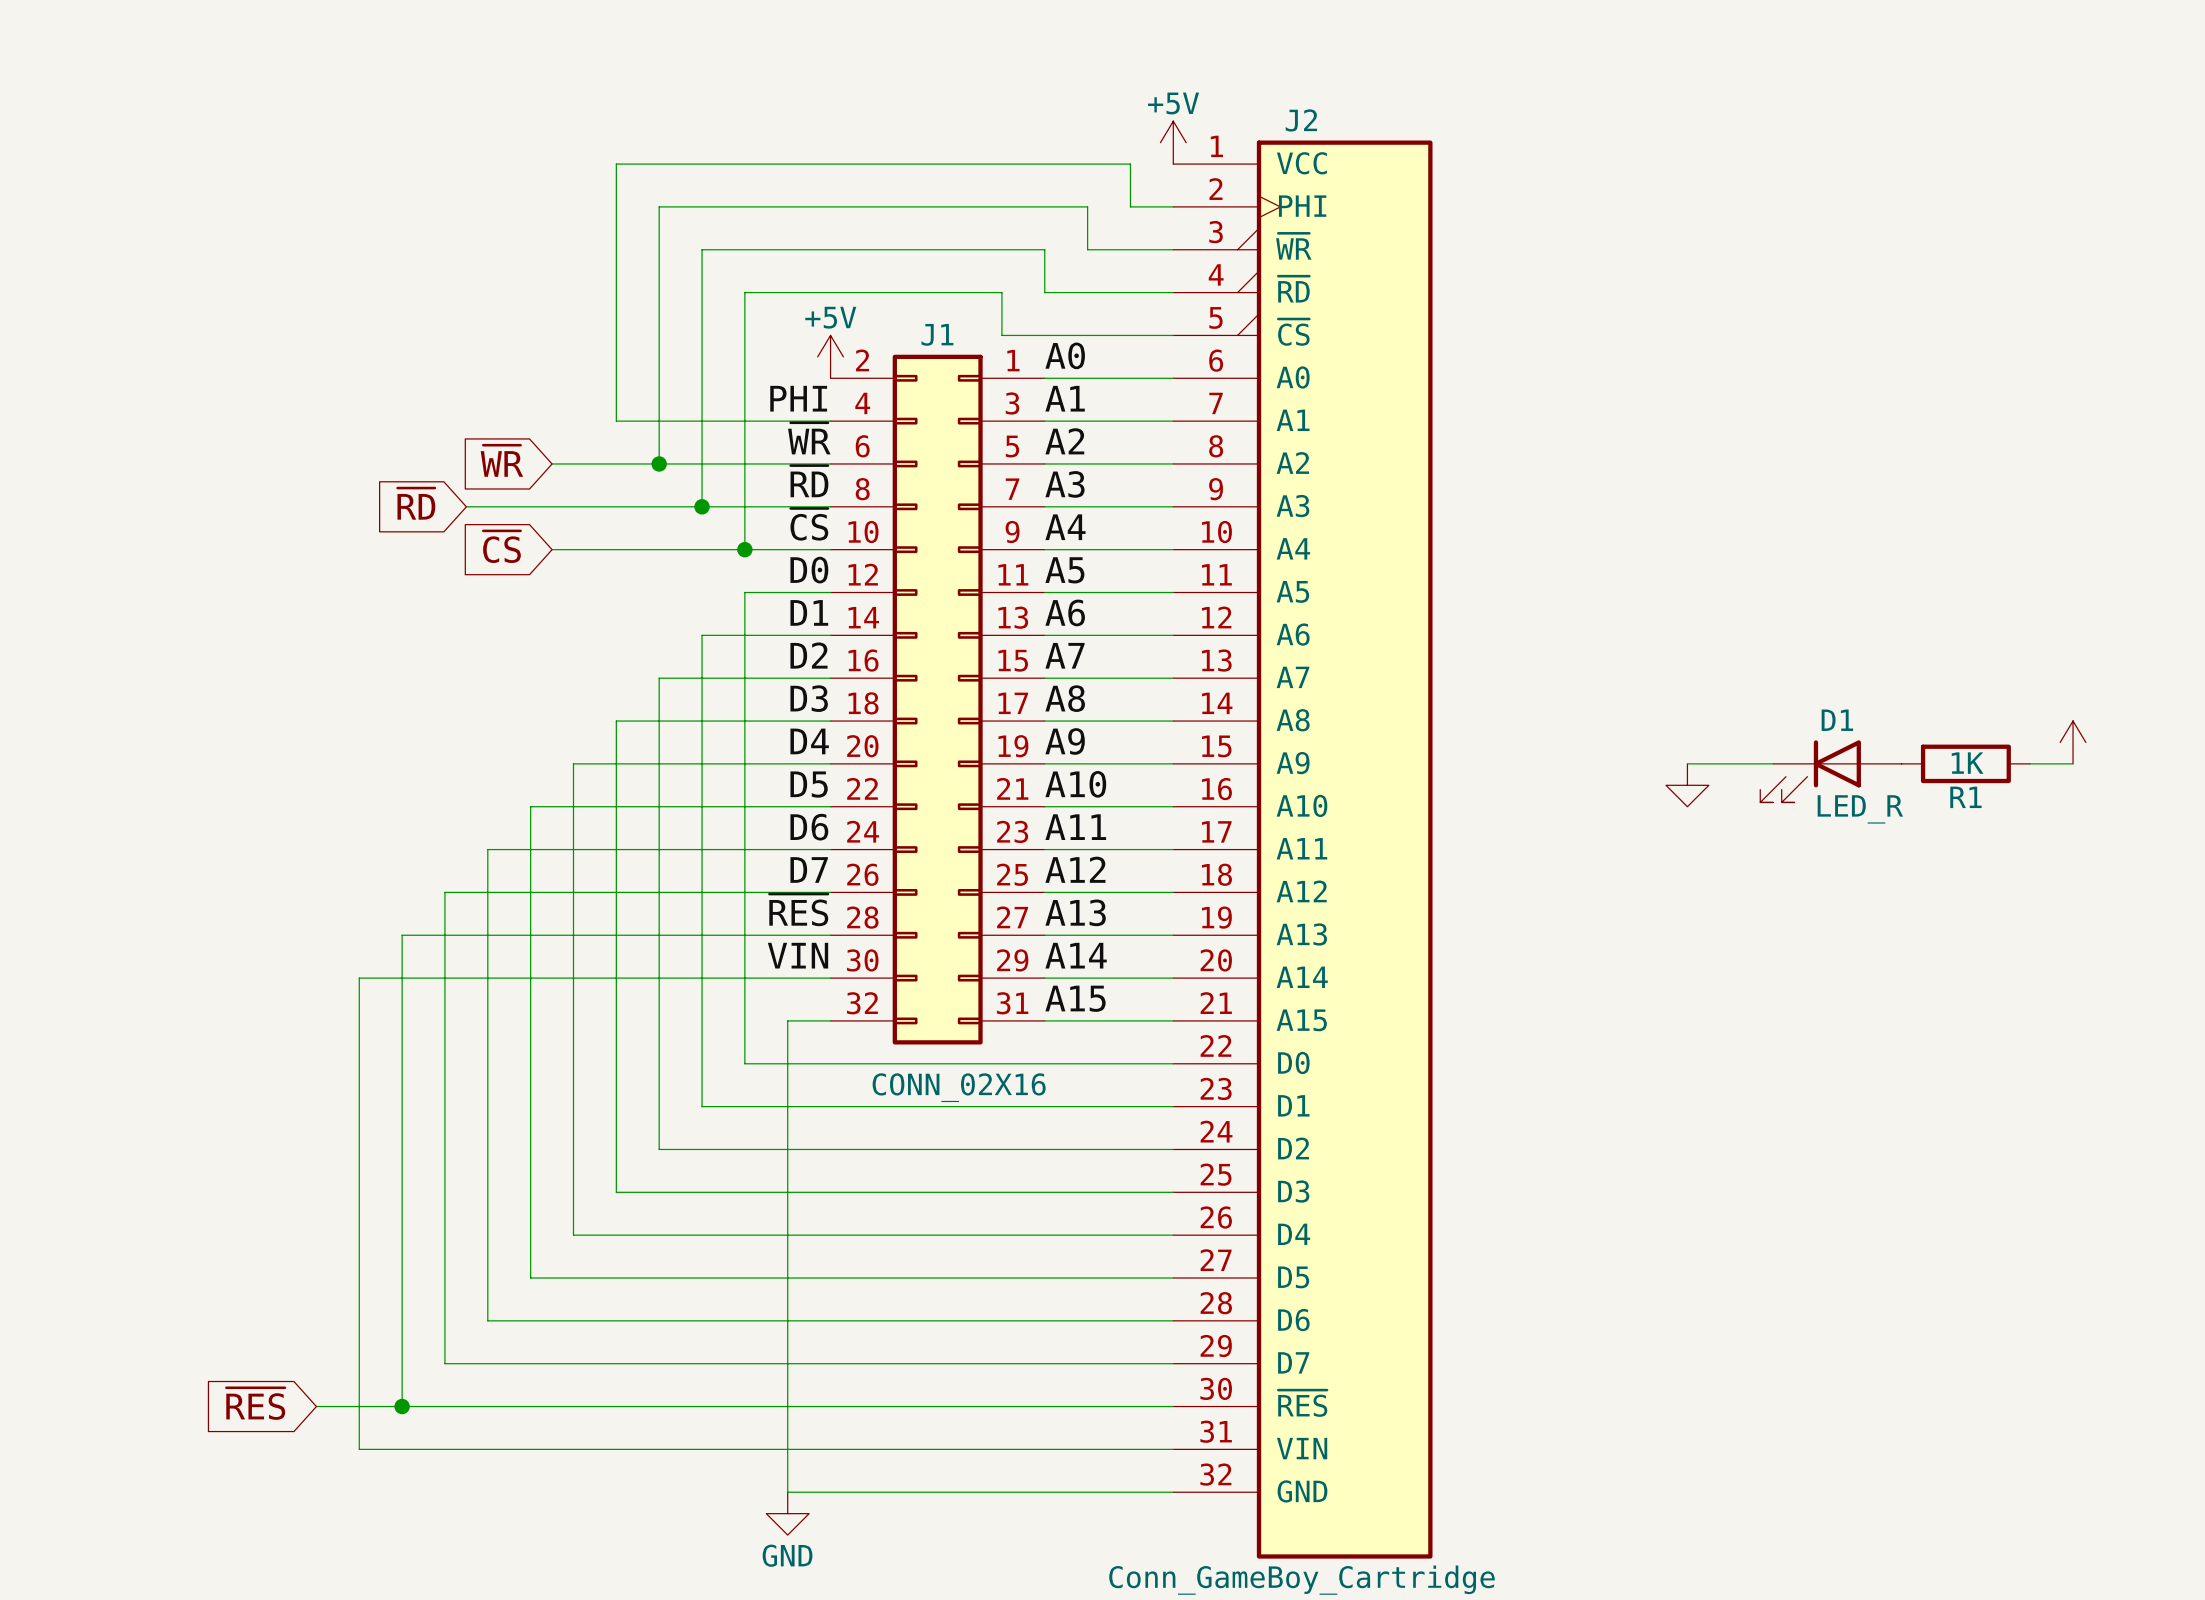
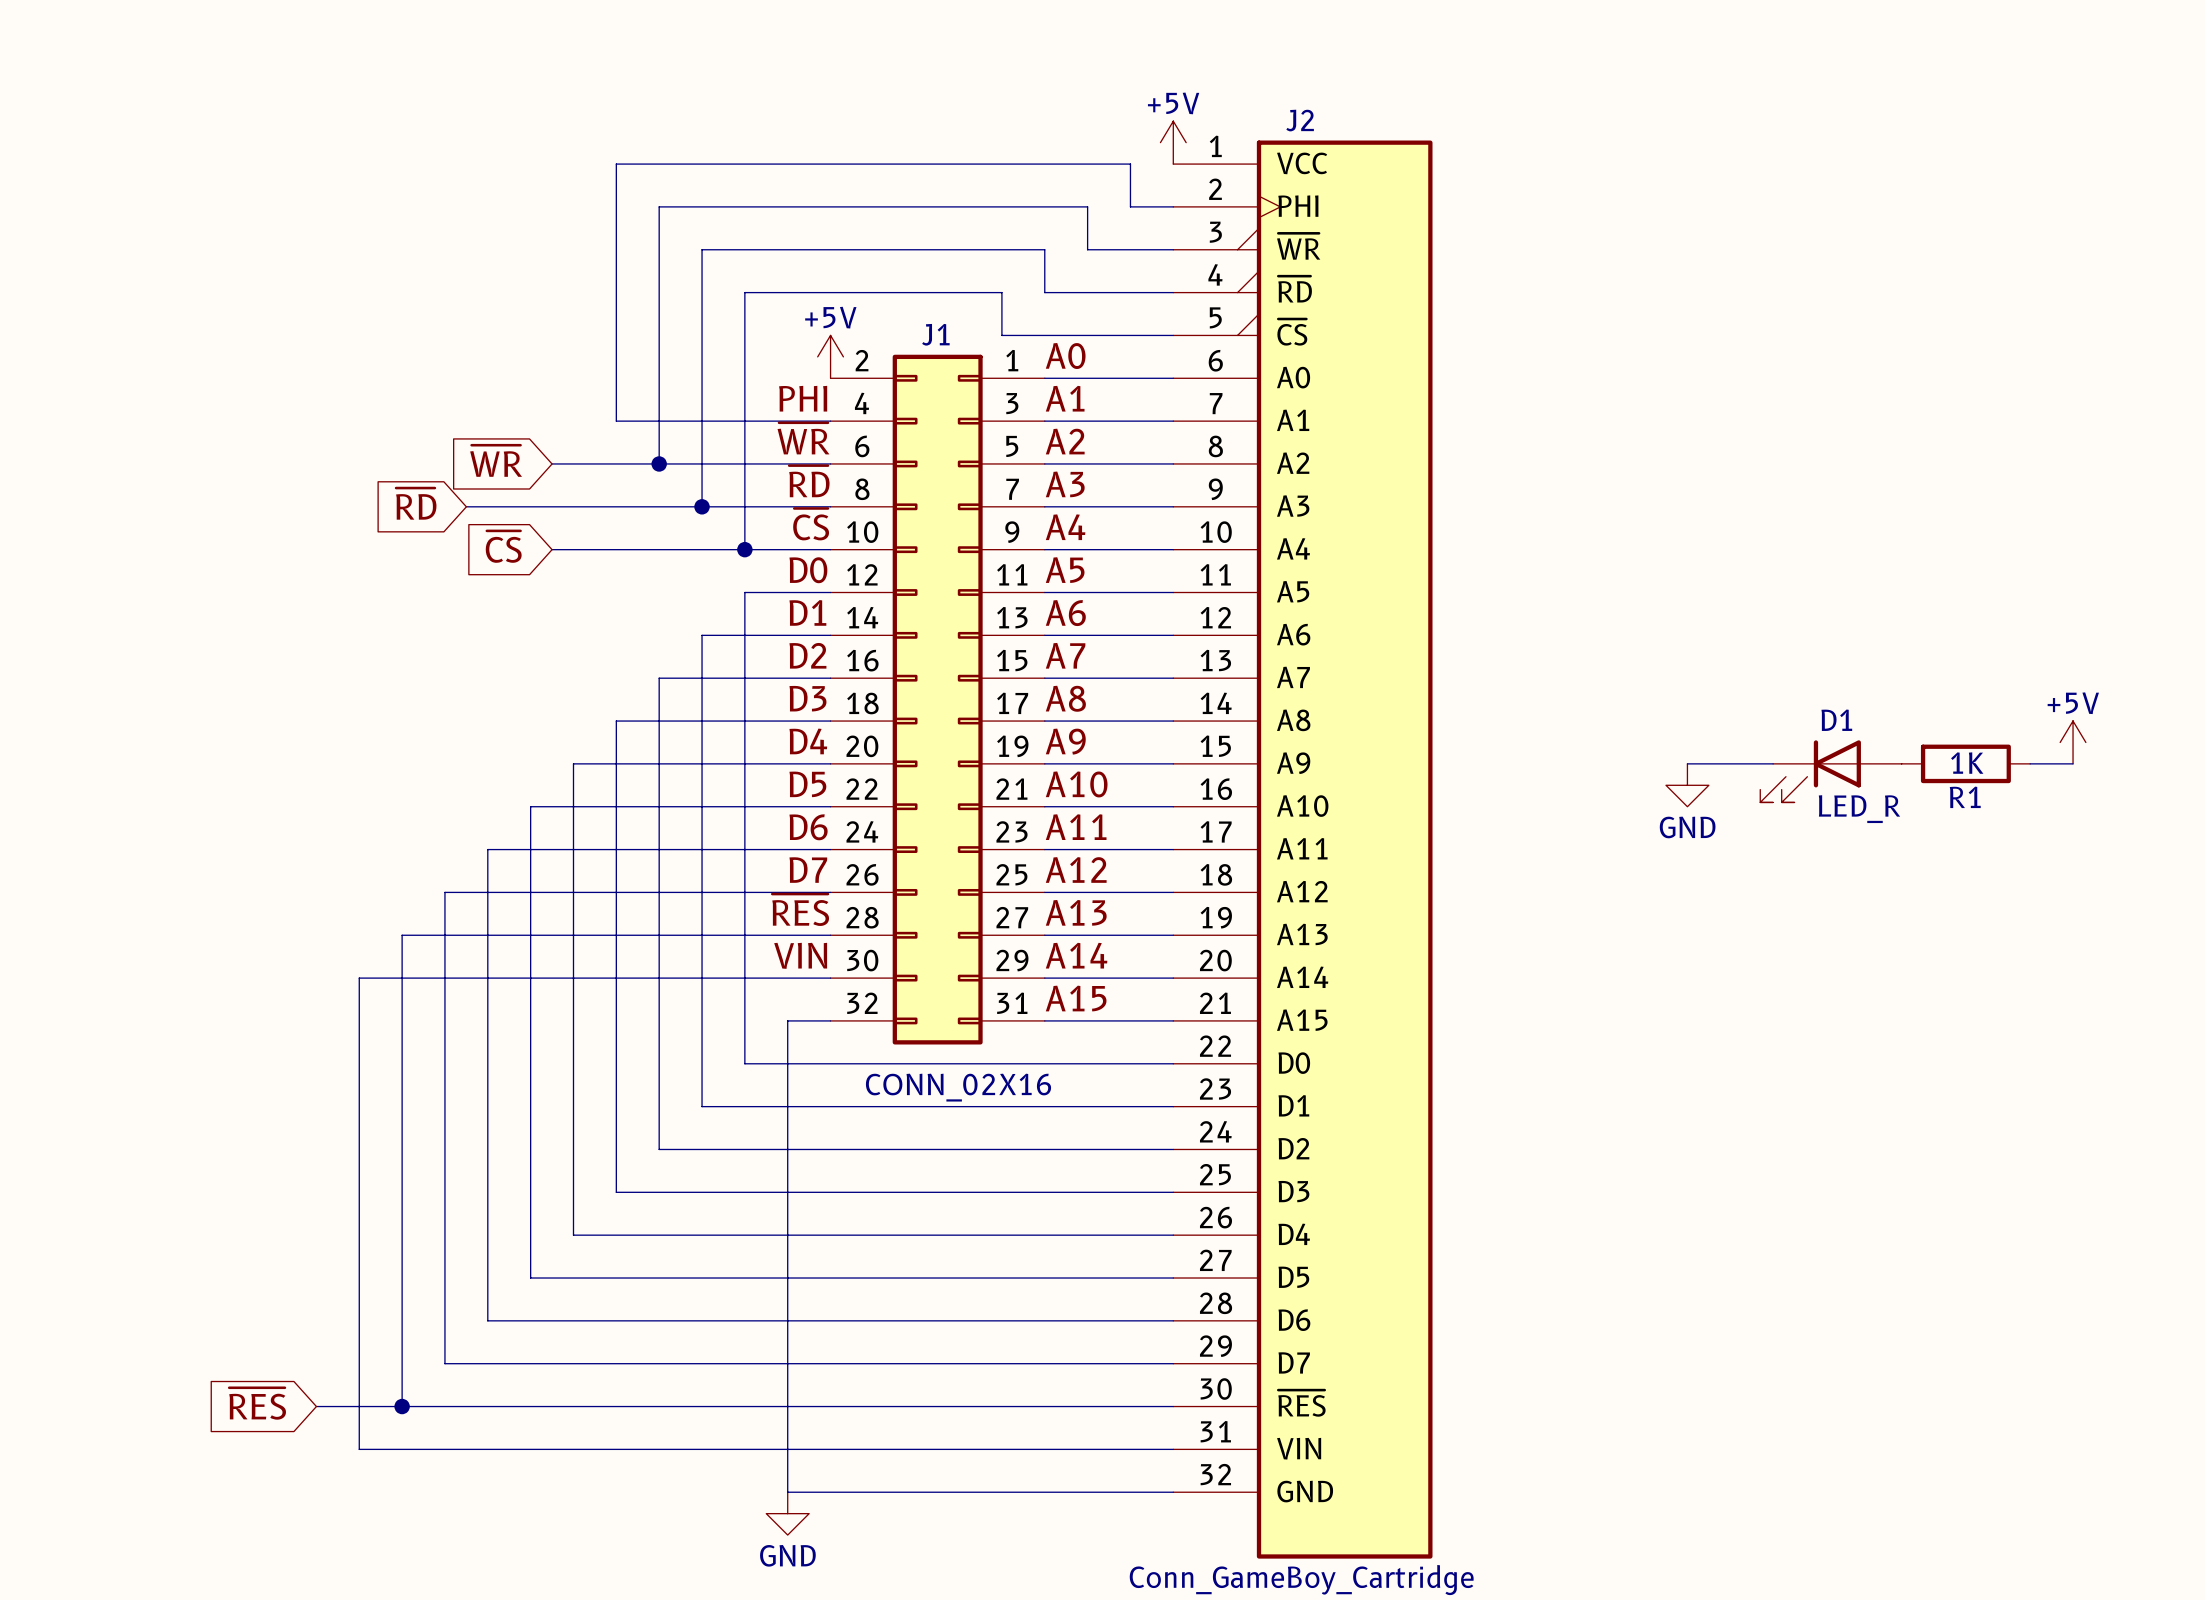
power symbol text: none -> +5V (2073, 703)
power symbol text: none -> GND (1687, 827)

